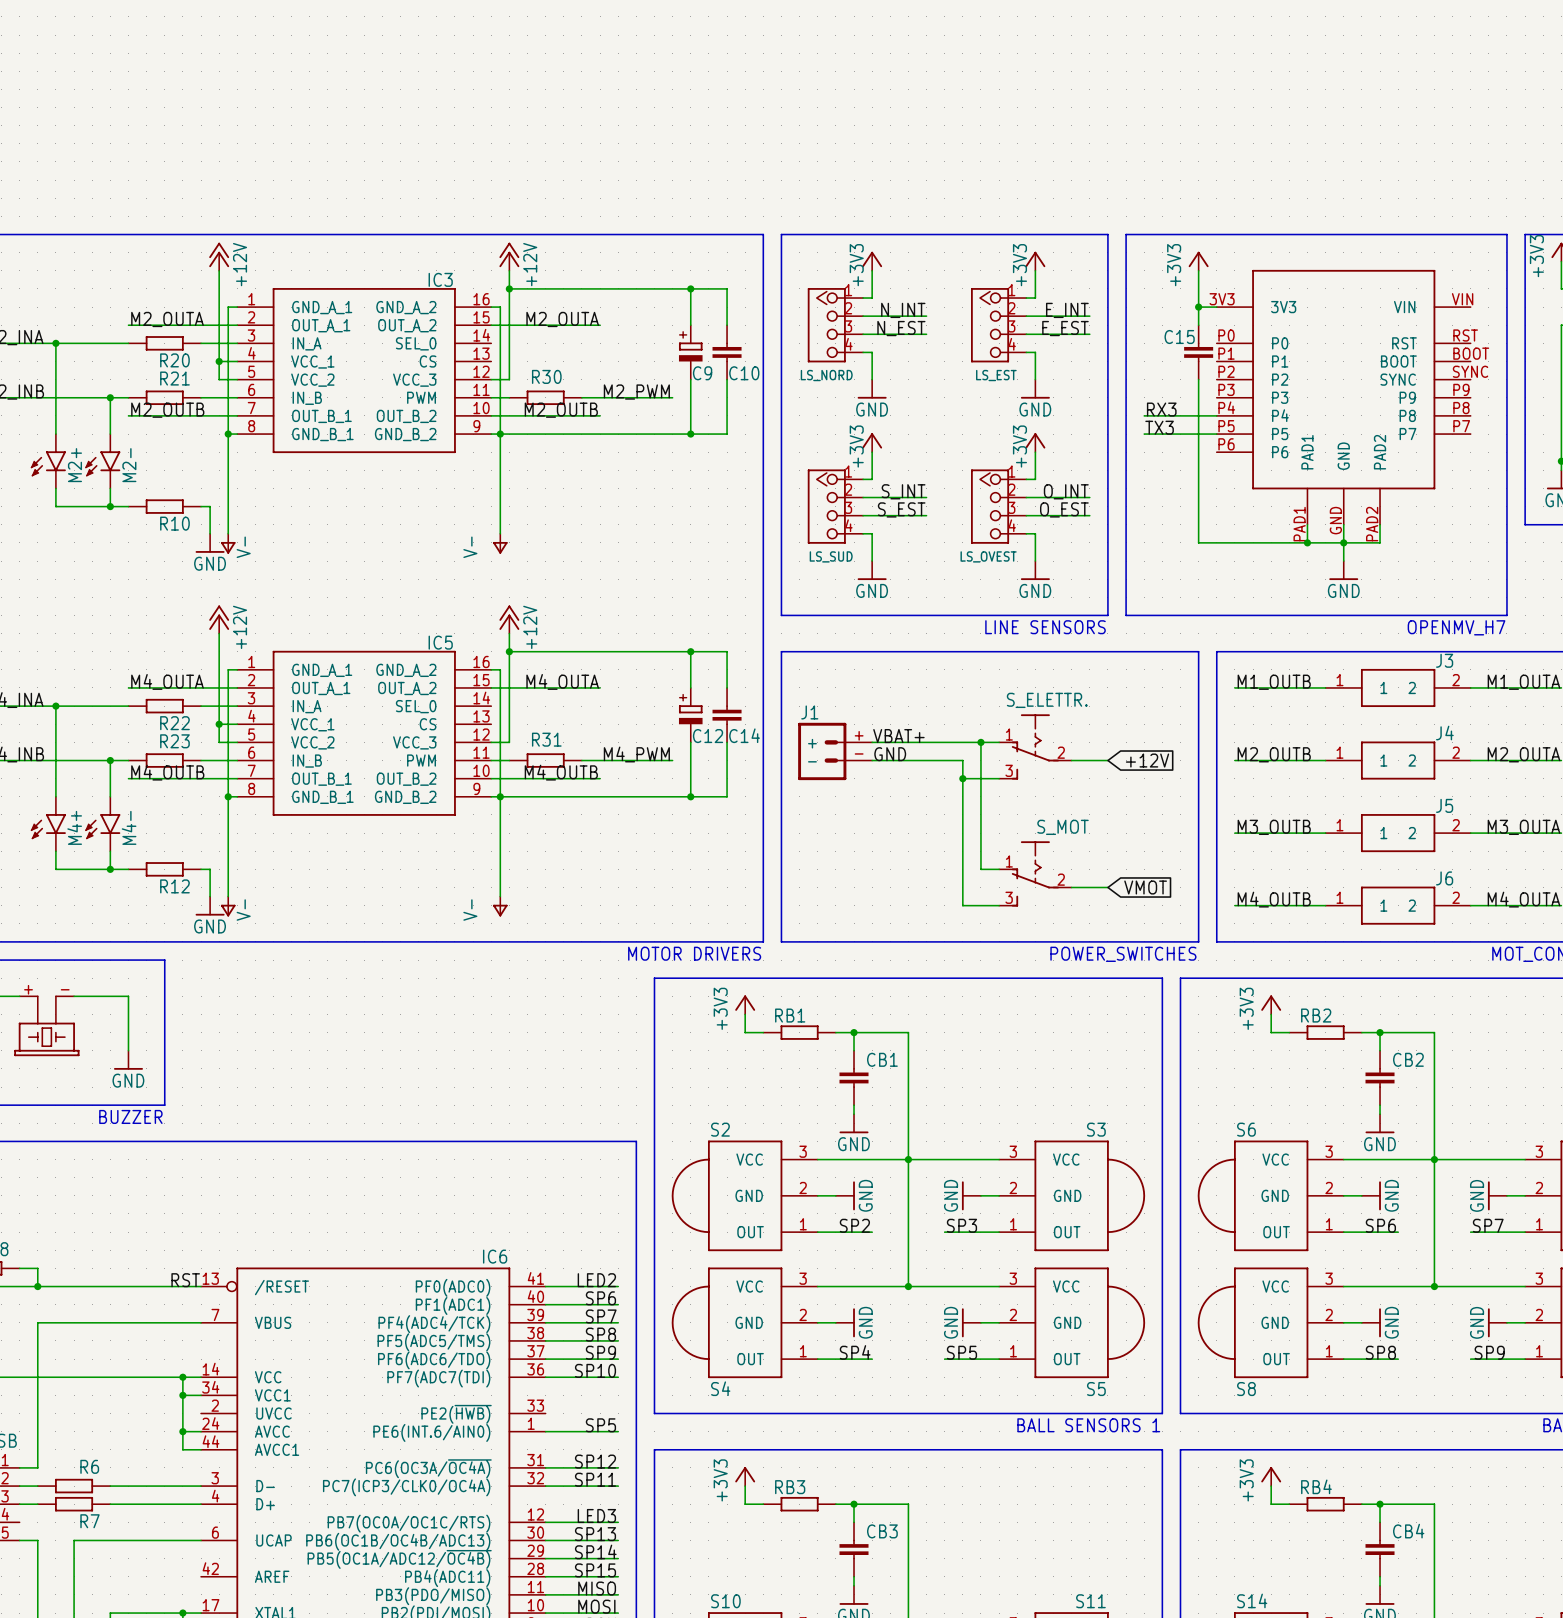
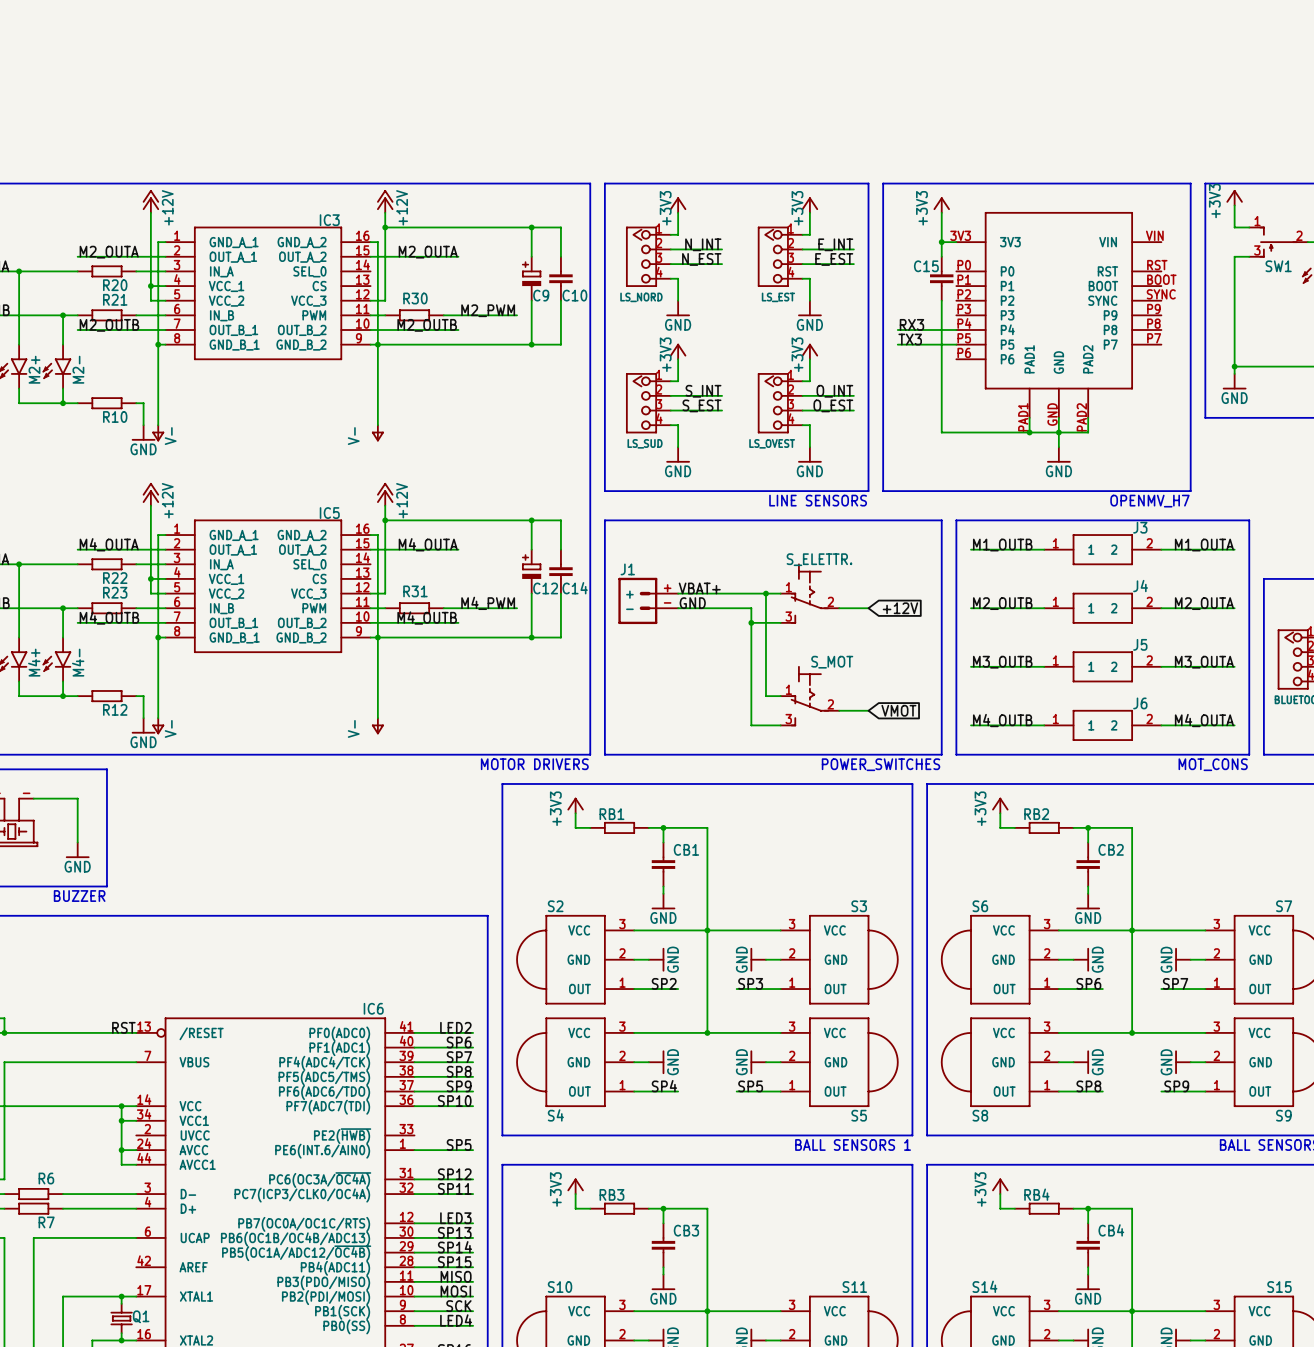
S_ELETTR. symbol: [999, 714, 1072, 780] -> [780, 563, 840, 624]
S_MOT symbol: [999, 841, 1072, 907] -> [780, 666, 840, 727]

